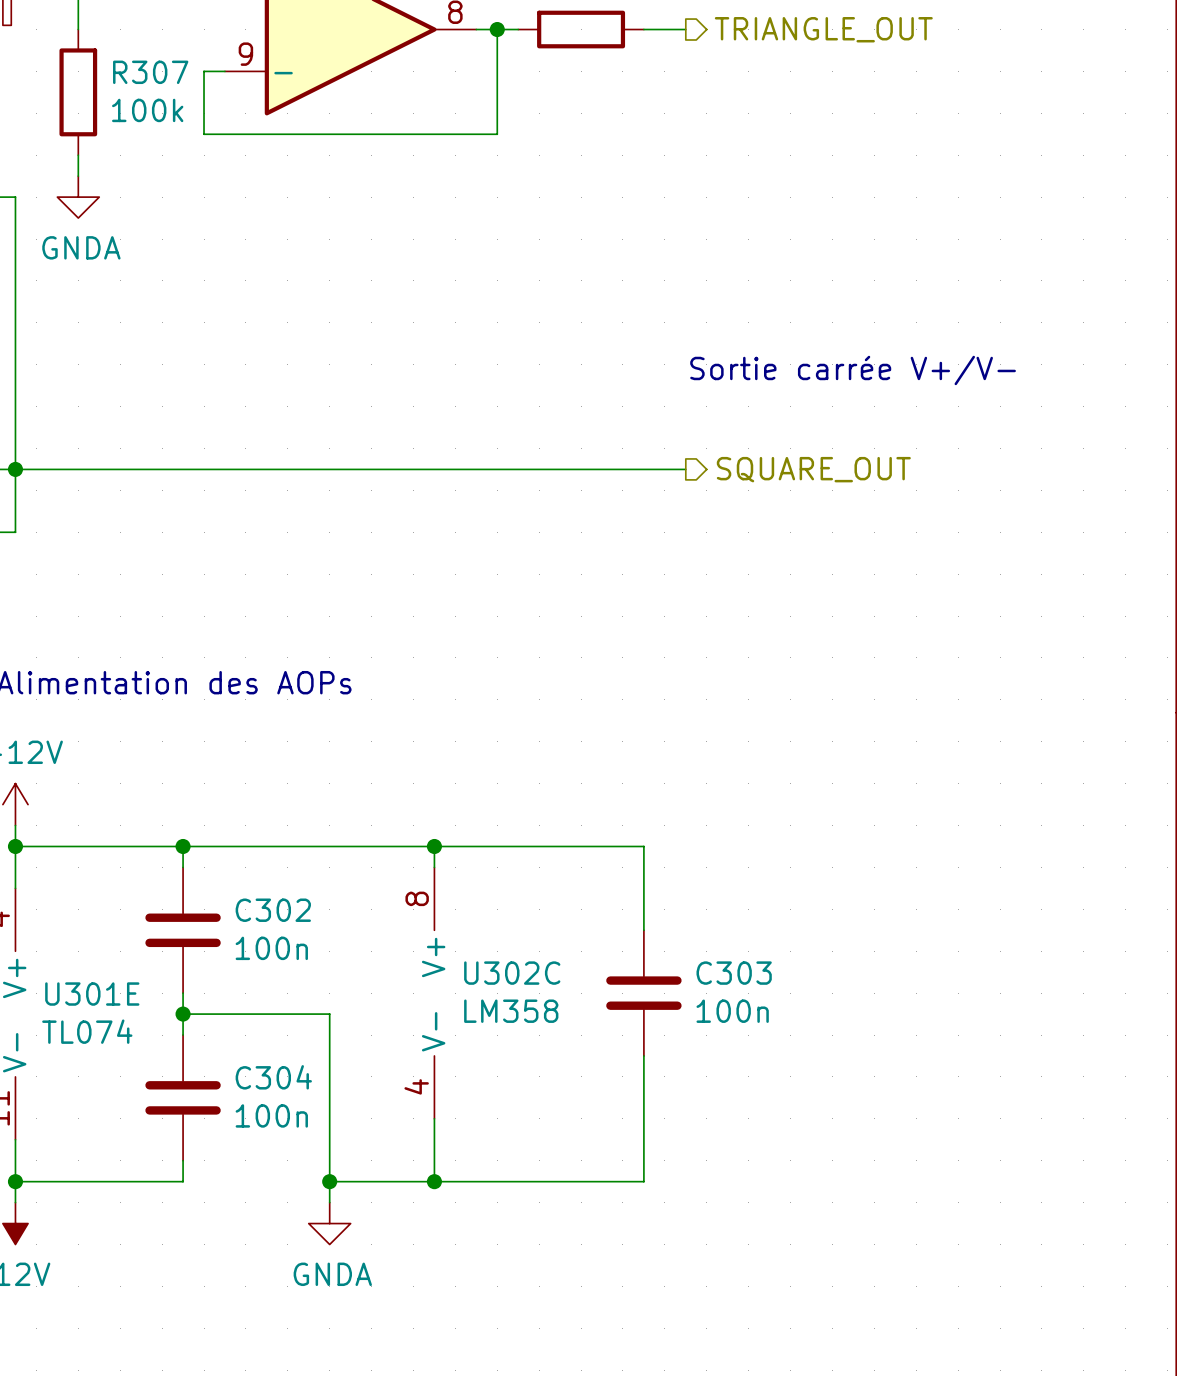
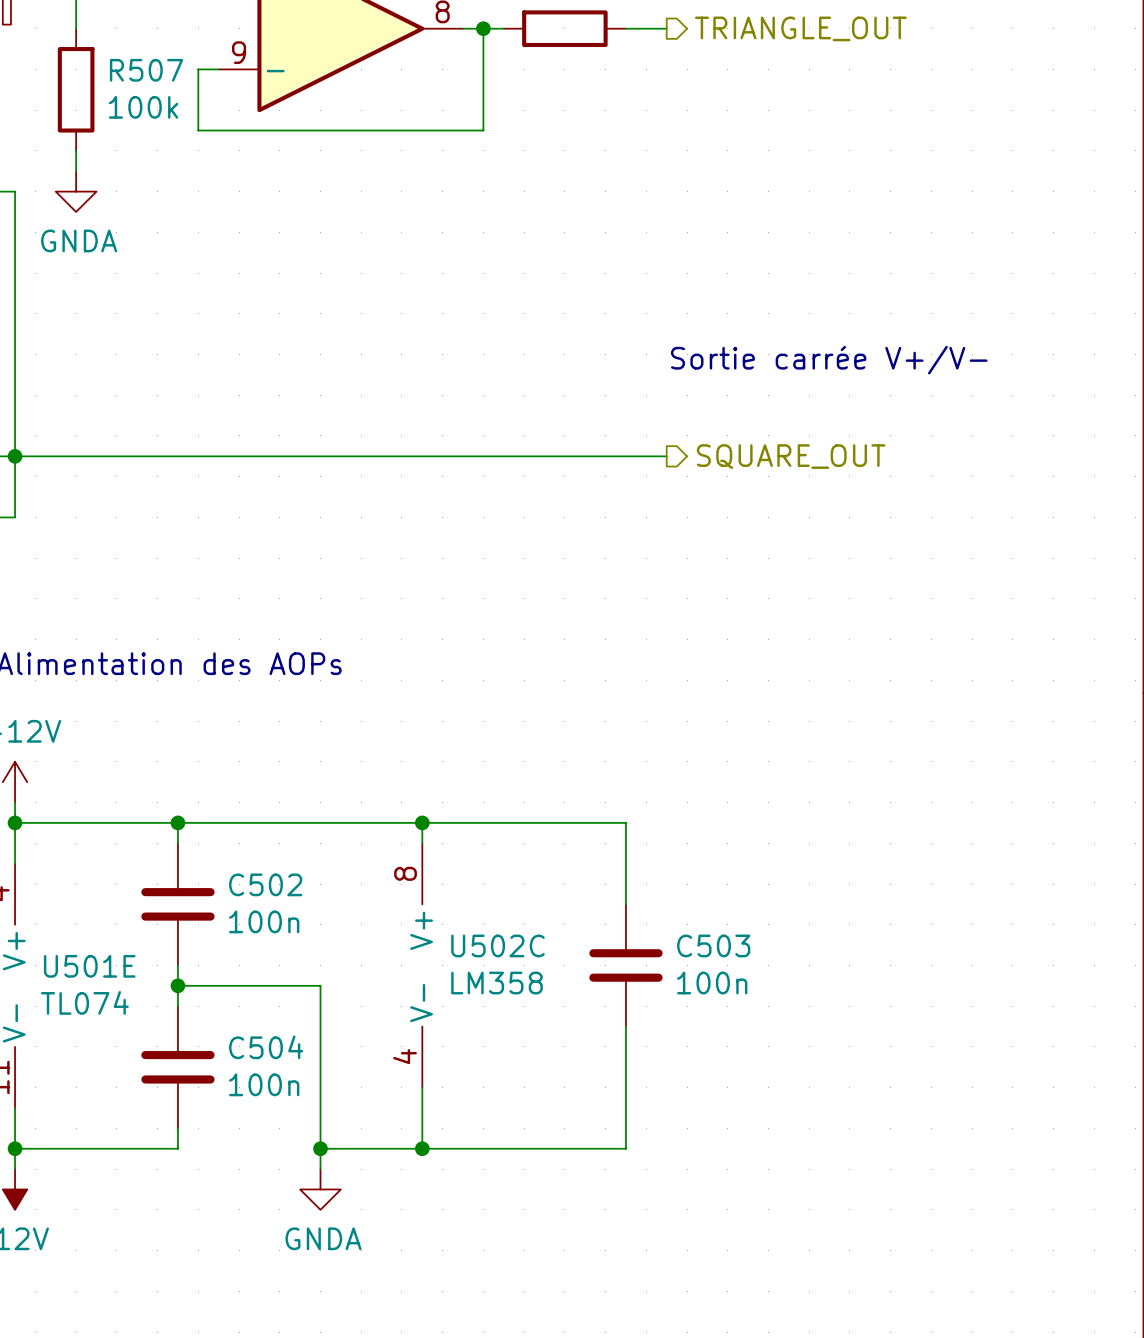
R307 name: R307 (150, 72) -> R507 (146, 70)
C302 name: C302 (273, 910) -> C502 (265, 884)
U302C name: U302C (512, 973) -> U502C (497, 945)
C303 name: C303 (734, 973) -> C503 (713, 945)
U301E name: U301E (92, 994) -> U501E (89, 966)
C304 name: C304 (273, 1077) -> C504 (266, 1047)

